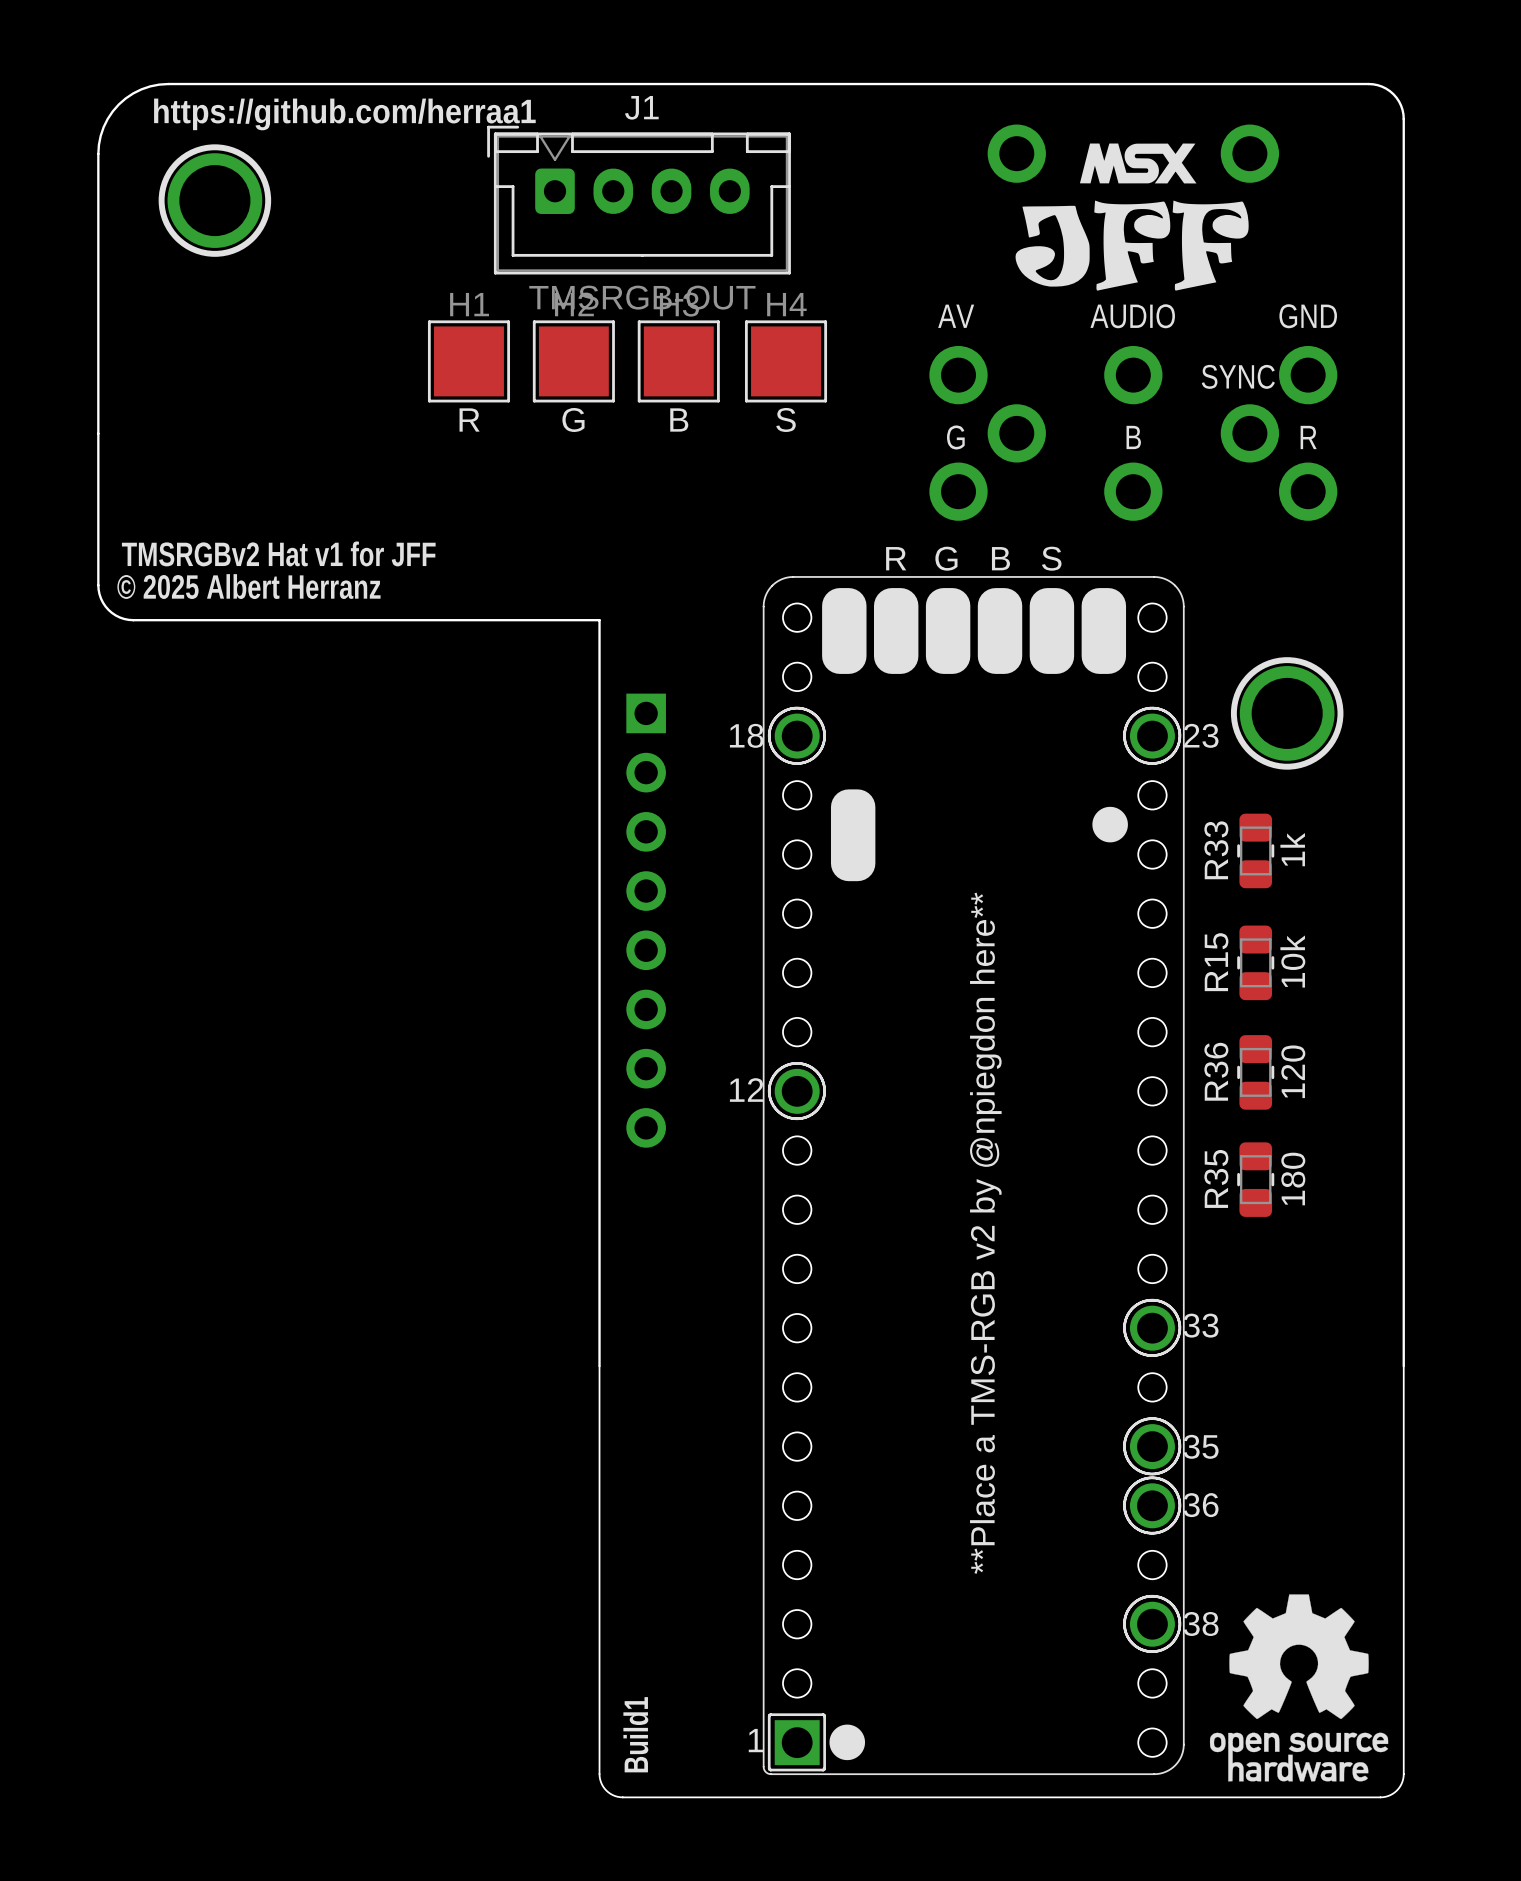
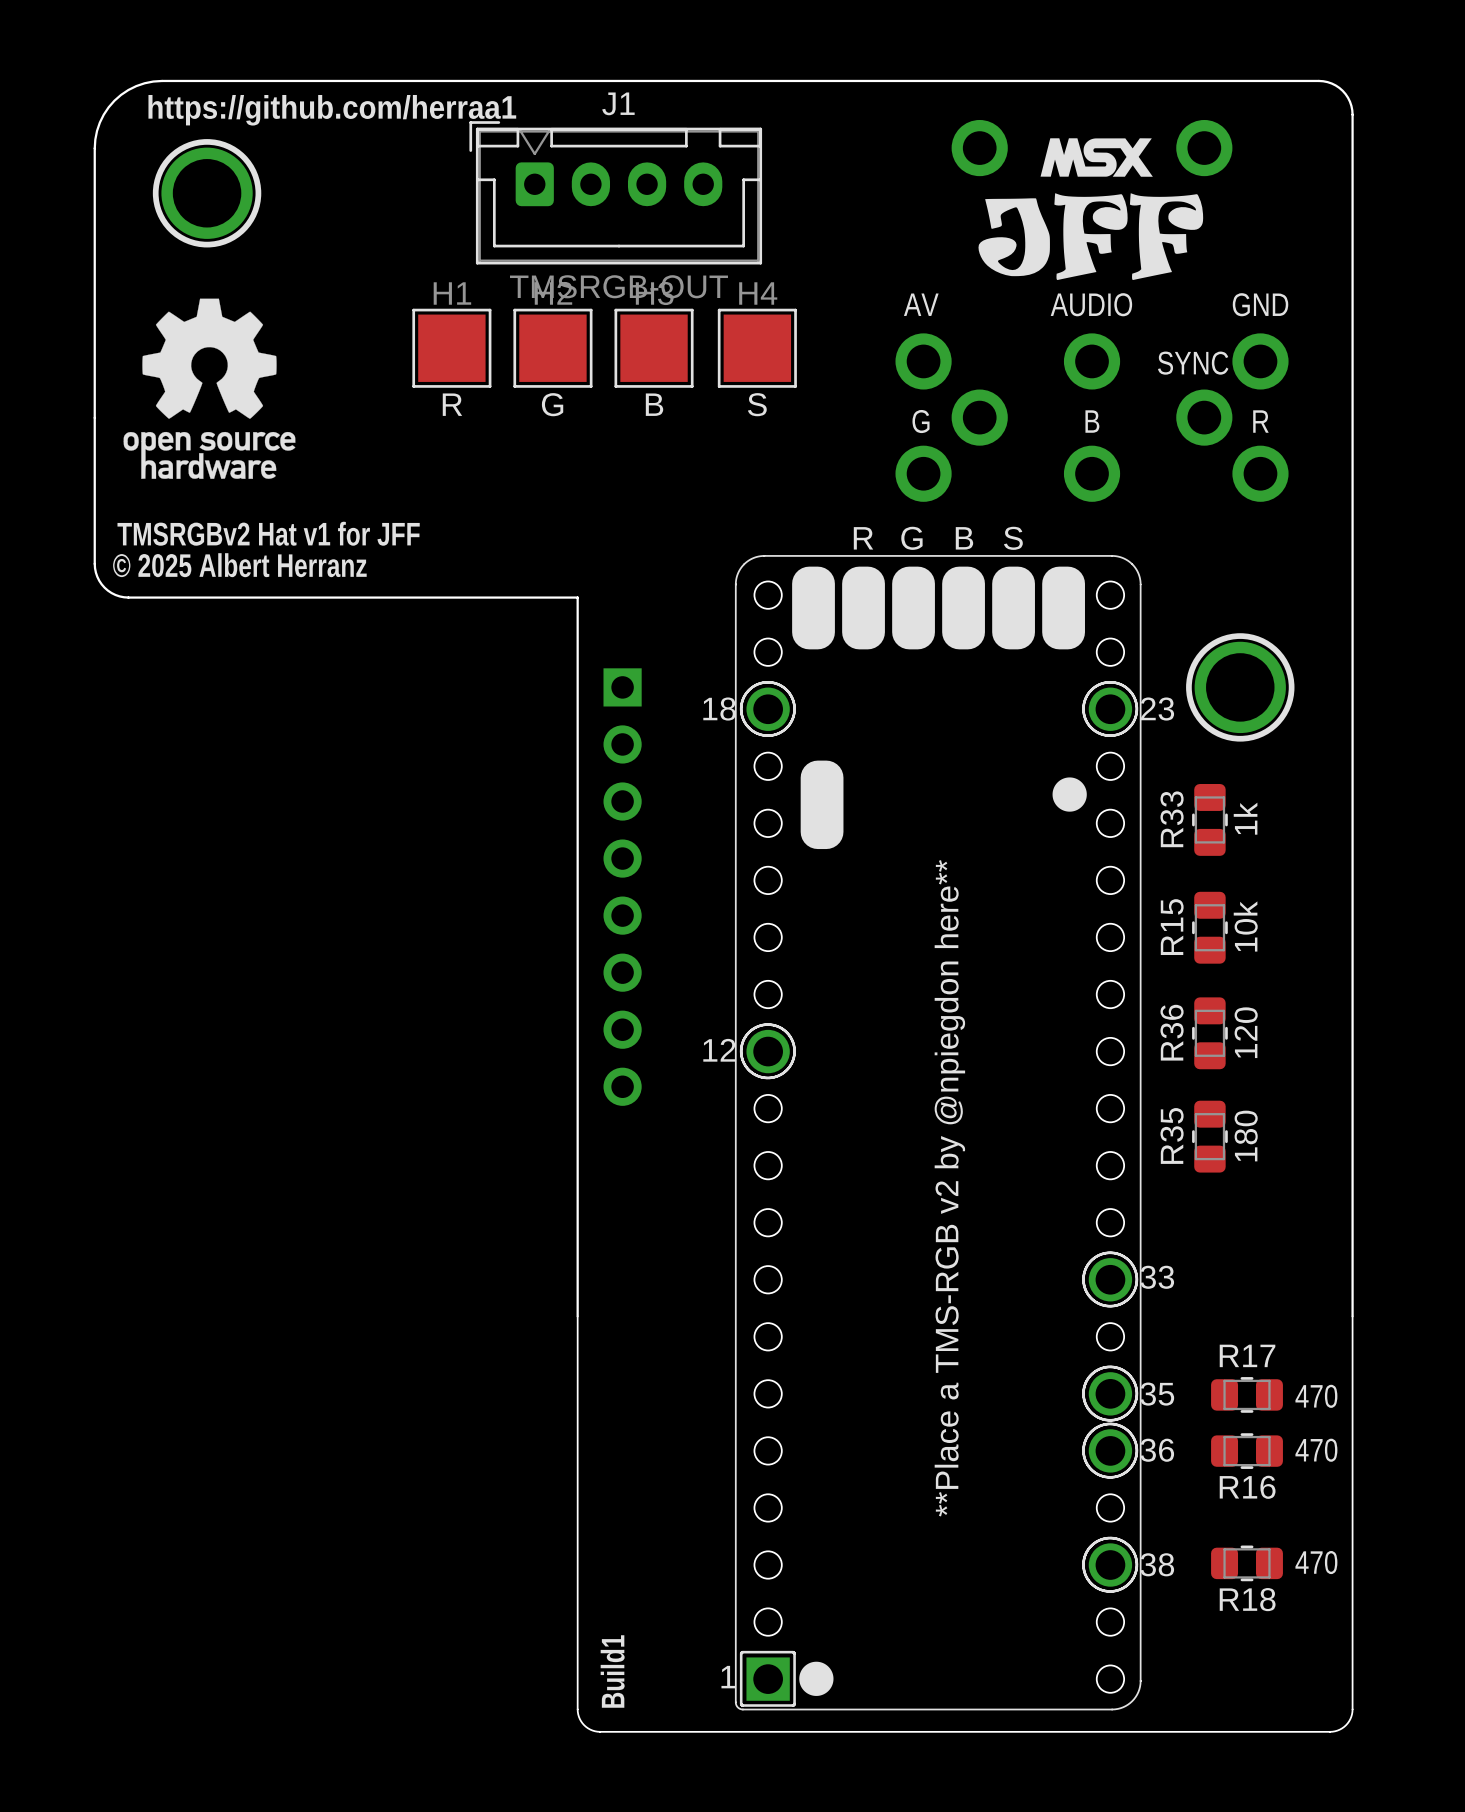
drawing: none -> [123, 298, 296, 479]
R17: none -> 470 (1247, 1394)
R16: none -> 470 (1247, 1451)
drawing: [1209, 1594, 1389, 1782] -> none
R18: none -> 470 (1247, 1563)

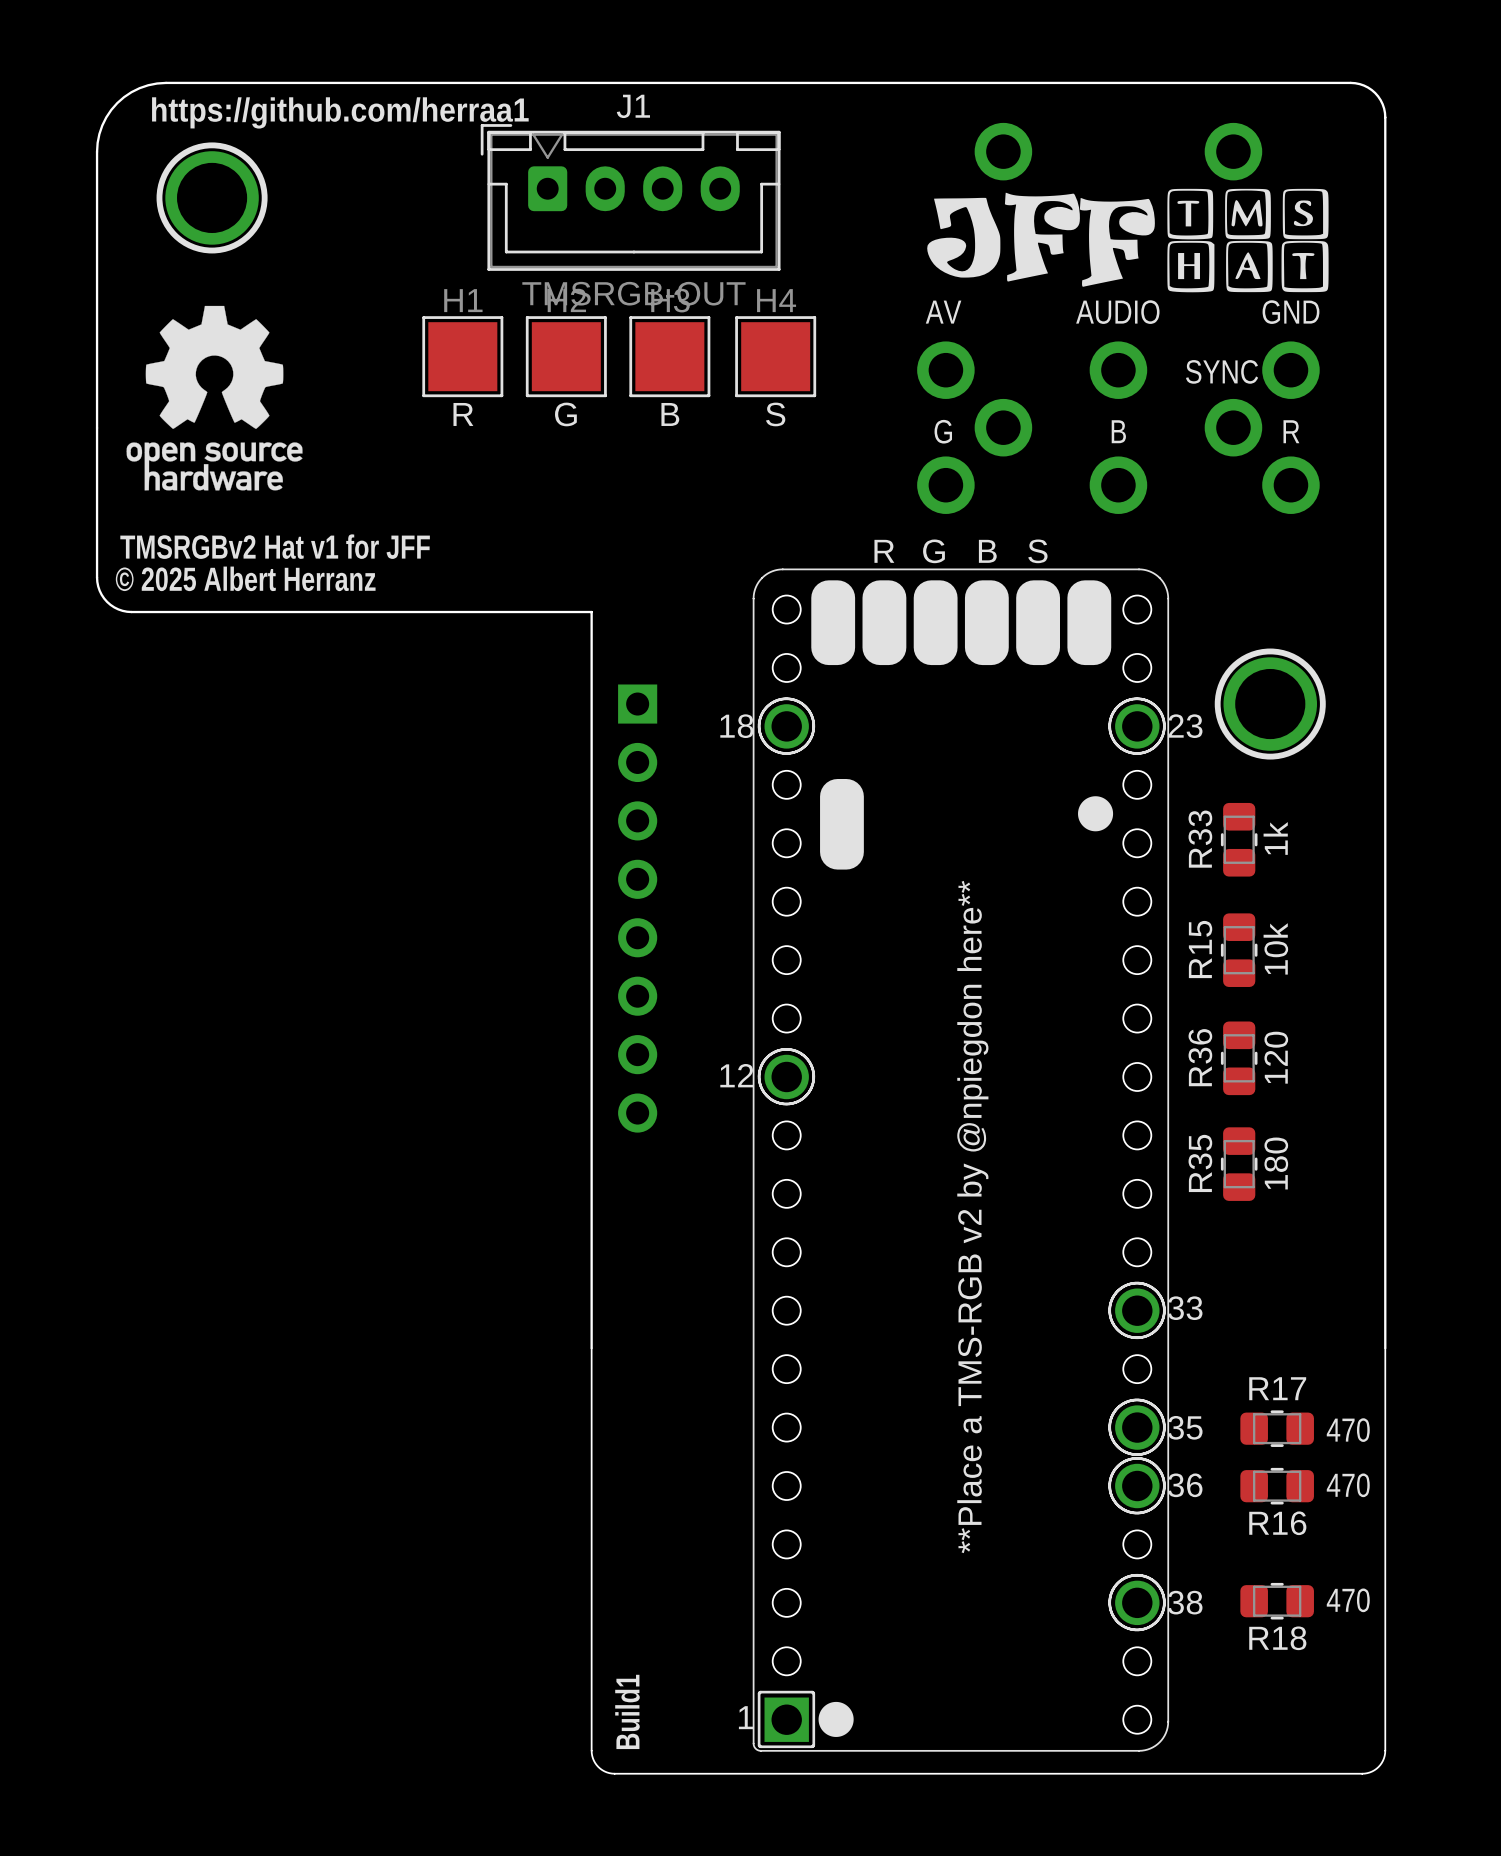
drawing: [1040, 138, 1153, 177] -> none
drawing: none -> [1167, 188, 1329, 293]
drawing position: (1166, 236) -> (1042, 237)
drawing position: (1014, 237) -> (963, 237)

